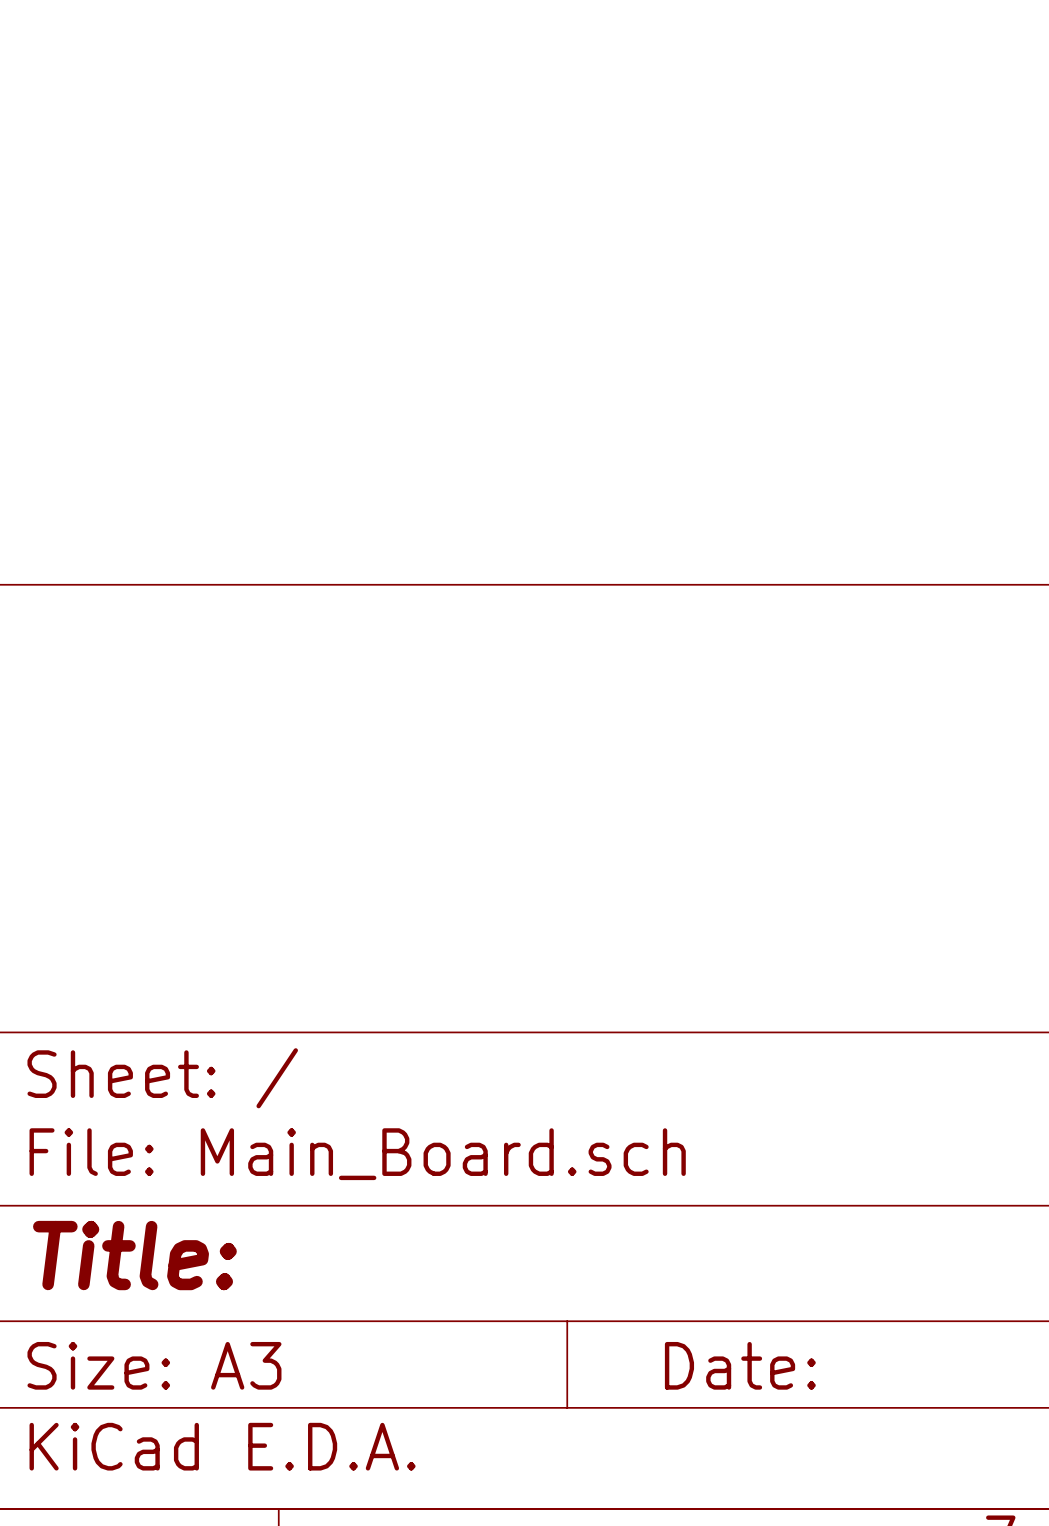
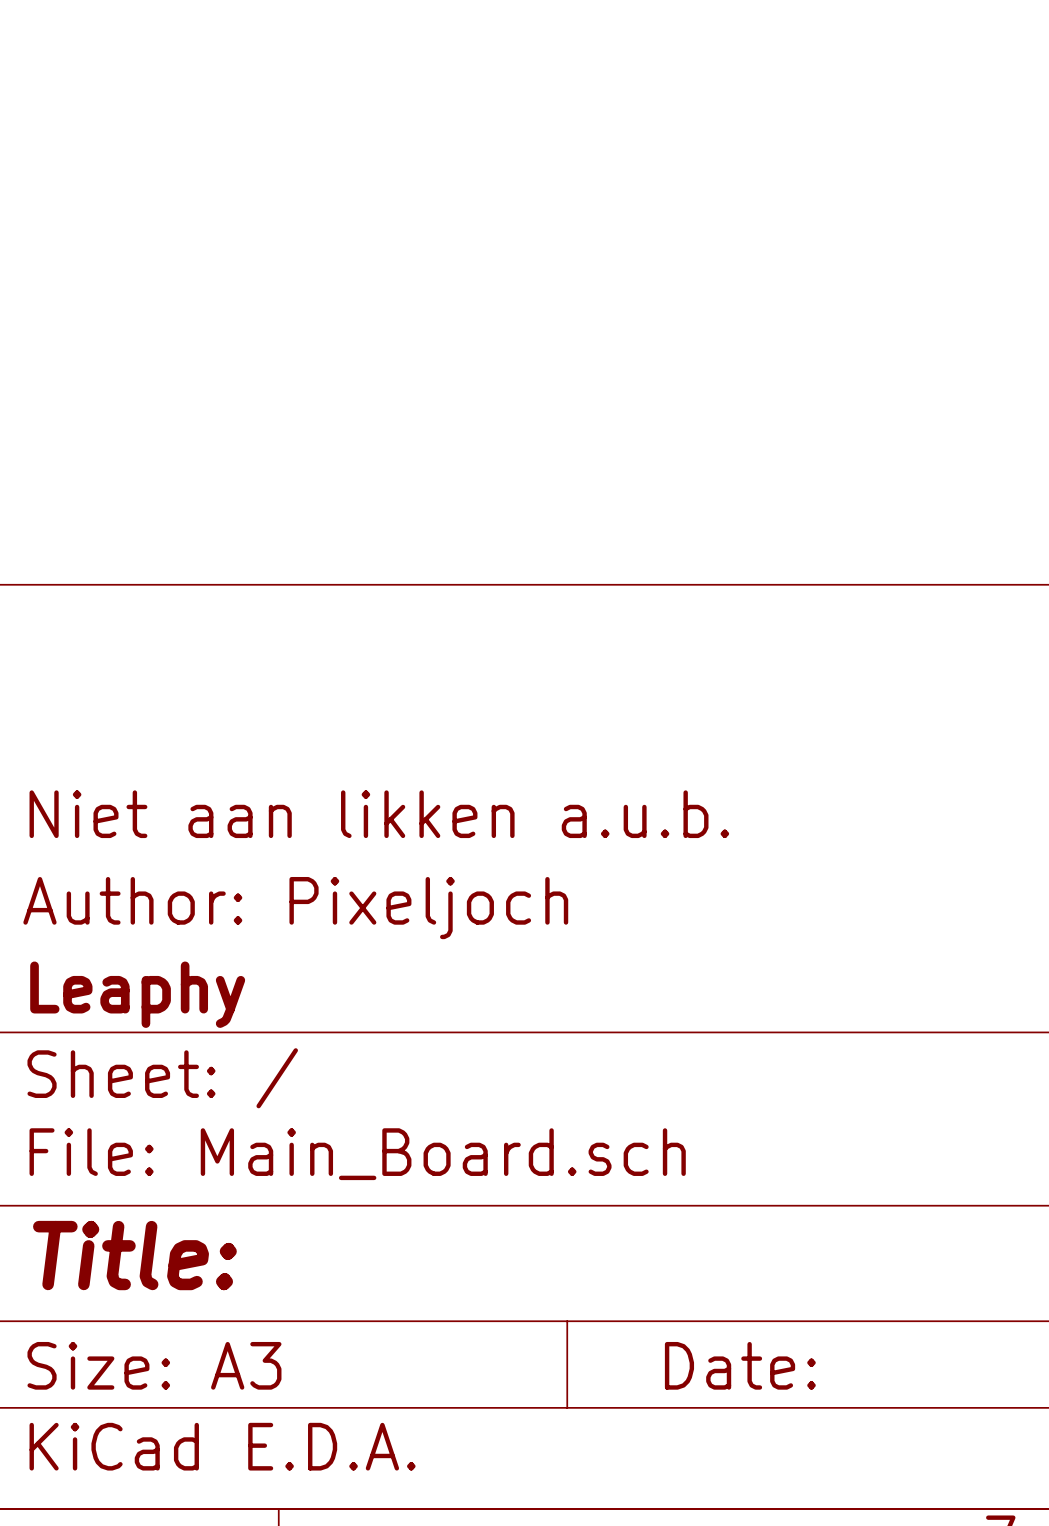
title block: none -> Niet aan likken a.u.b. (379, 814)
title block: none -> Author: Pixeljoch (295, 908)
title block: none -> Leaphy (137, 994)

